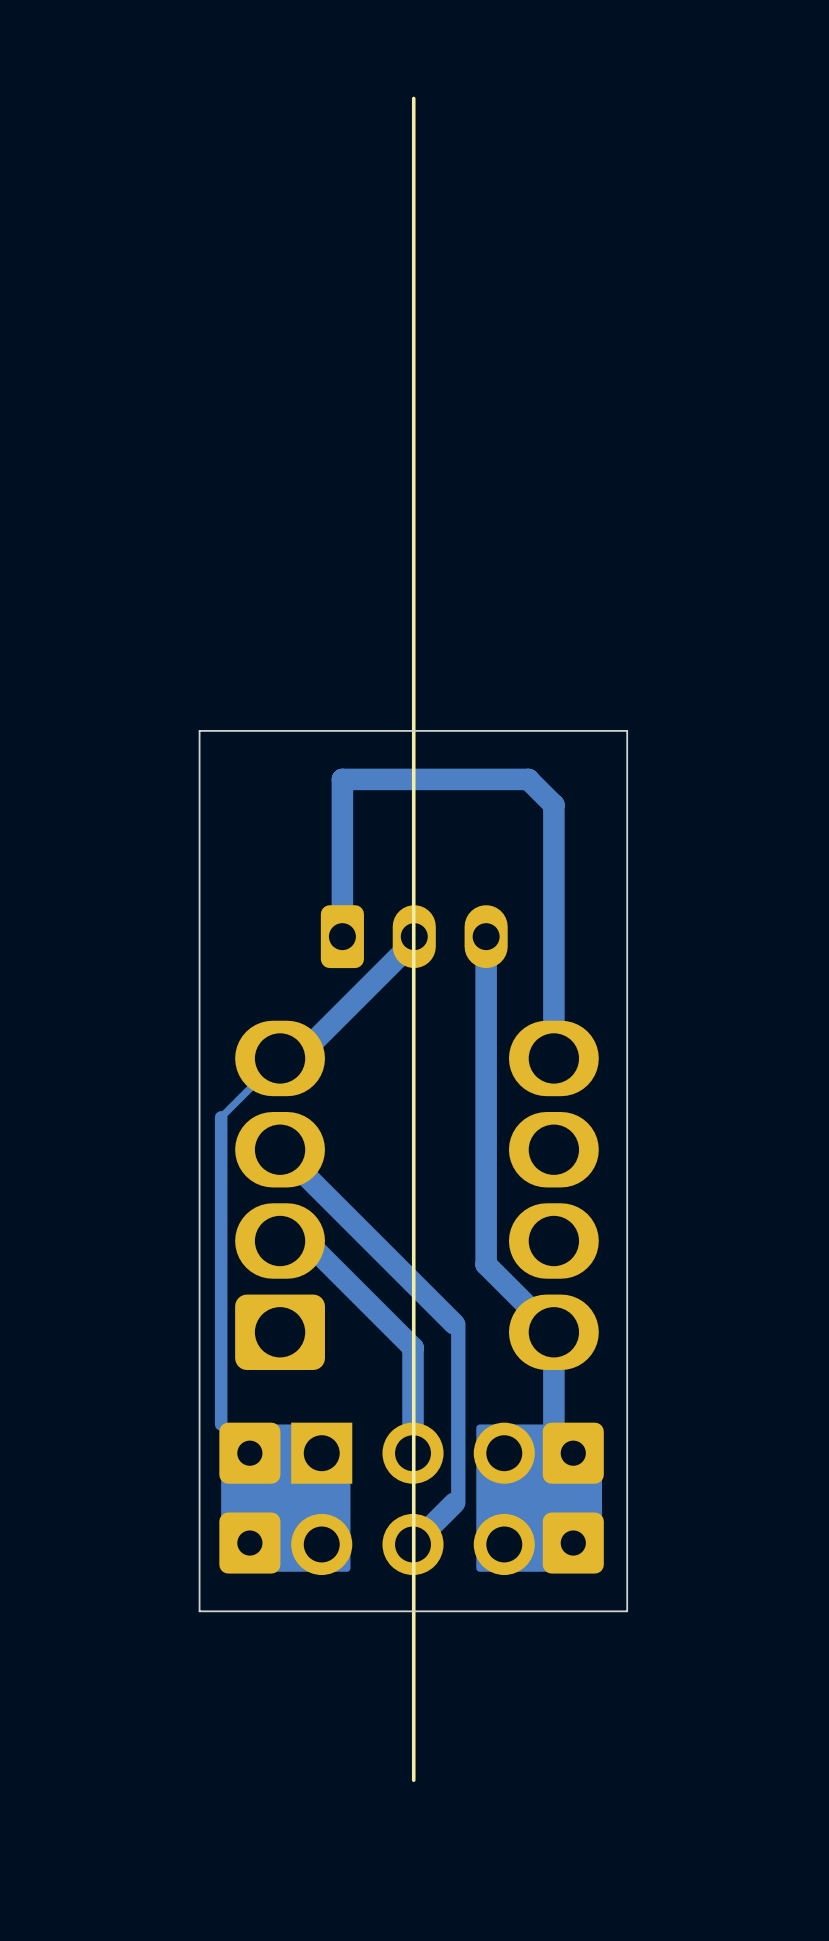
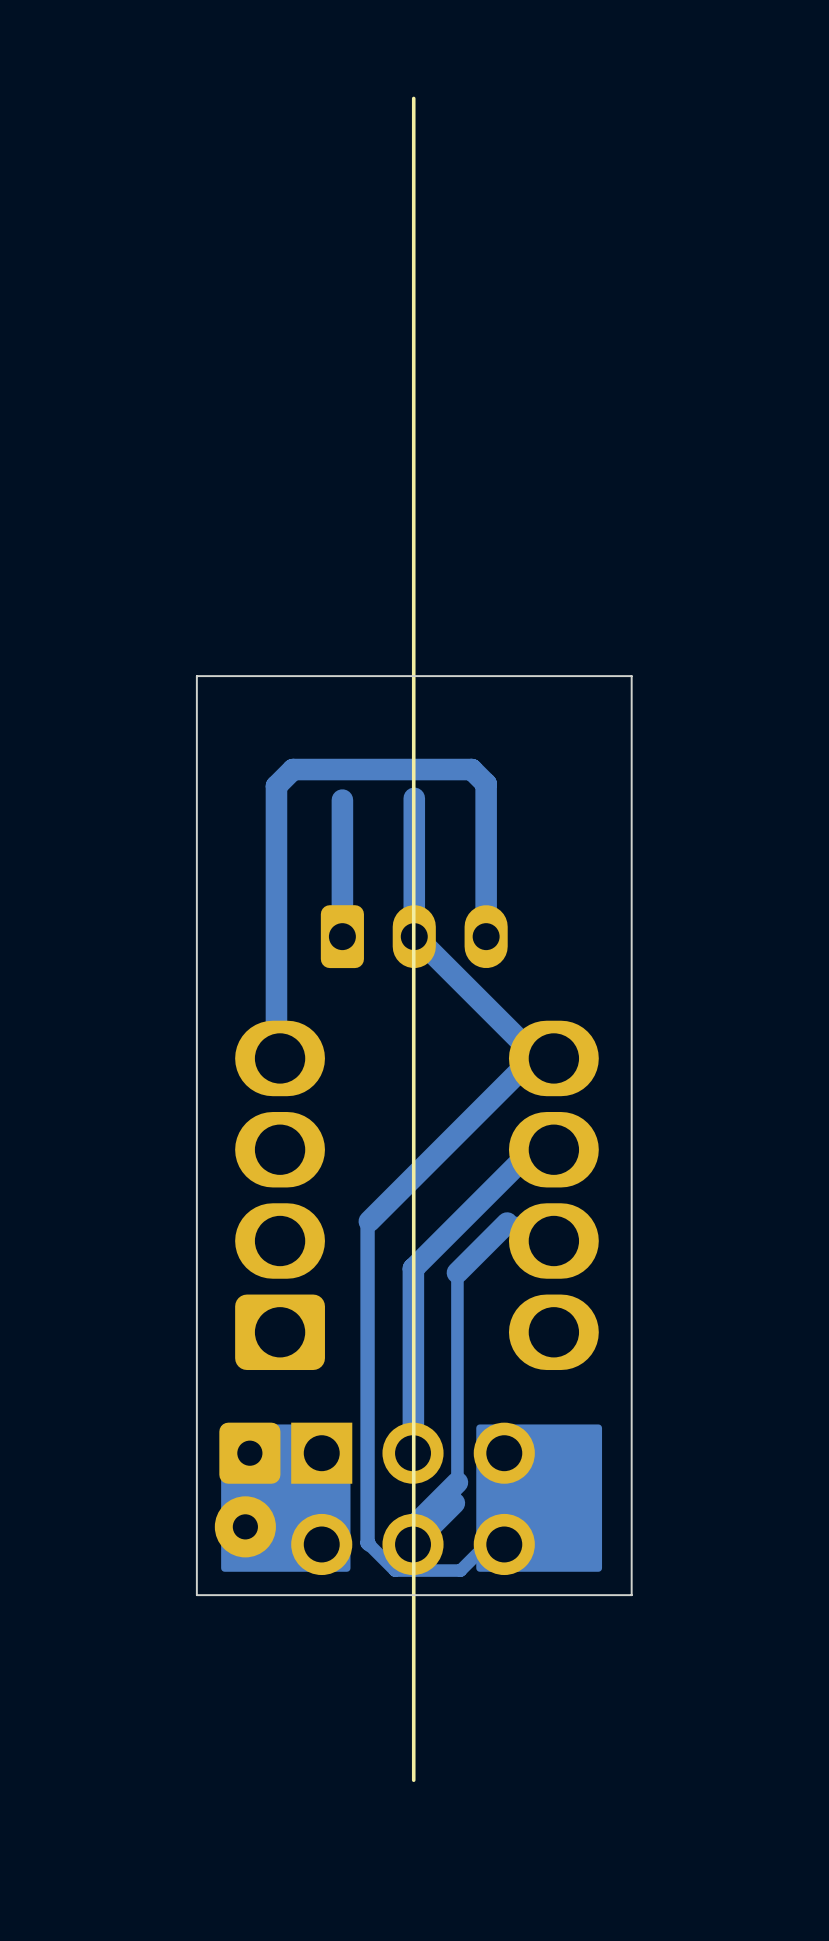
board edge: (199, 730) (627, 730) (627, 1611) (199, 1611) (199, 730) -> (196, 676) (196, 1595) (631, 1595) (631, 676) (196, 676)
bottom track: none -> (414, 798) (414, 934) (519, 1040) (550, 1040) (367, 1223) (367, 1542) (395, 1570) (460, 1570) (504, 1526) (504, 1435)
bottom track: (342, 800) (342, 779) (528, 779) (553, 804) (553, 1058) -> none
bottom track: none -> (486, 917) (486, 783) (471, 769) (292, 769) (276, 786) (276, 1040)
bottom track: (414, 936) (414, 941) (296, 1058) (280, 1058) (221, 1117) (221, 1424) (249, 1453) -> none
bottom track: (486, 936) (486, 1264) (553, 1332) (553, 1433) (573, 1453) -> none
bottom track: none -> (550, 1131) (413, 1268) (413, 1435)
bottom track: (280, 1149) (454, 1324) -> none
bottom track: none -> (550, 1223) (507, 1223) (457, 1272) (457, 1482) (413, 1526)
bottom track: (280, 1241) (306, 1241) (413, 1347) (413, 1453) -> none
bottom track: (458, 1324) (458, 1503) -> none
part: (573, 1453) -> none
part footprint: [219, 1512, 281, 1574] -> [214, 1496, 276, 1558]
part: (573, 1543) -> none

